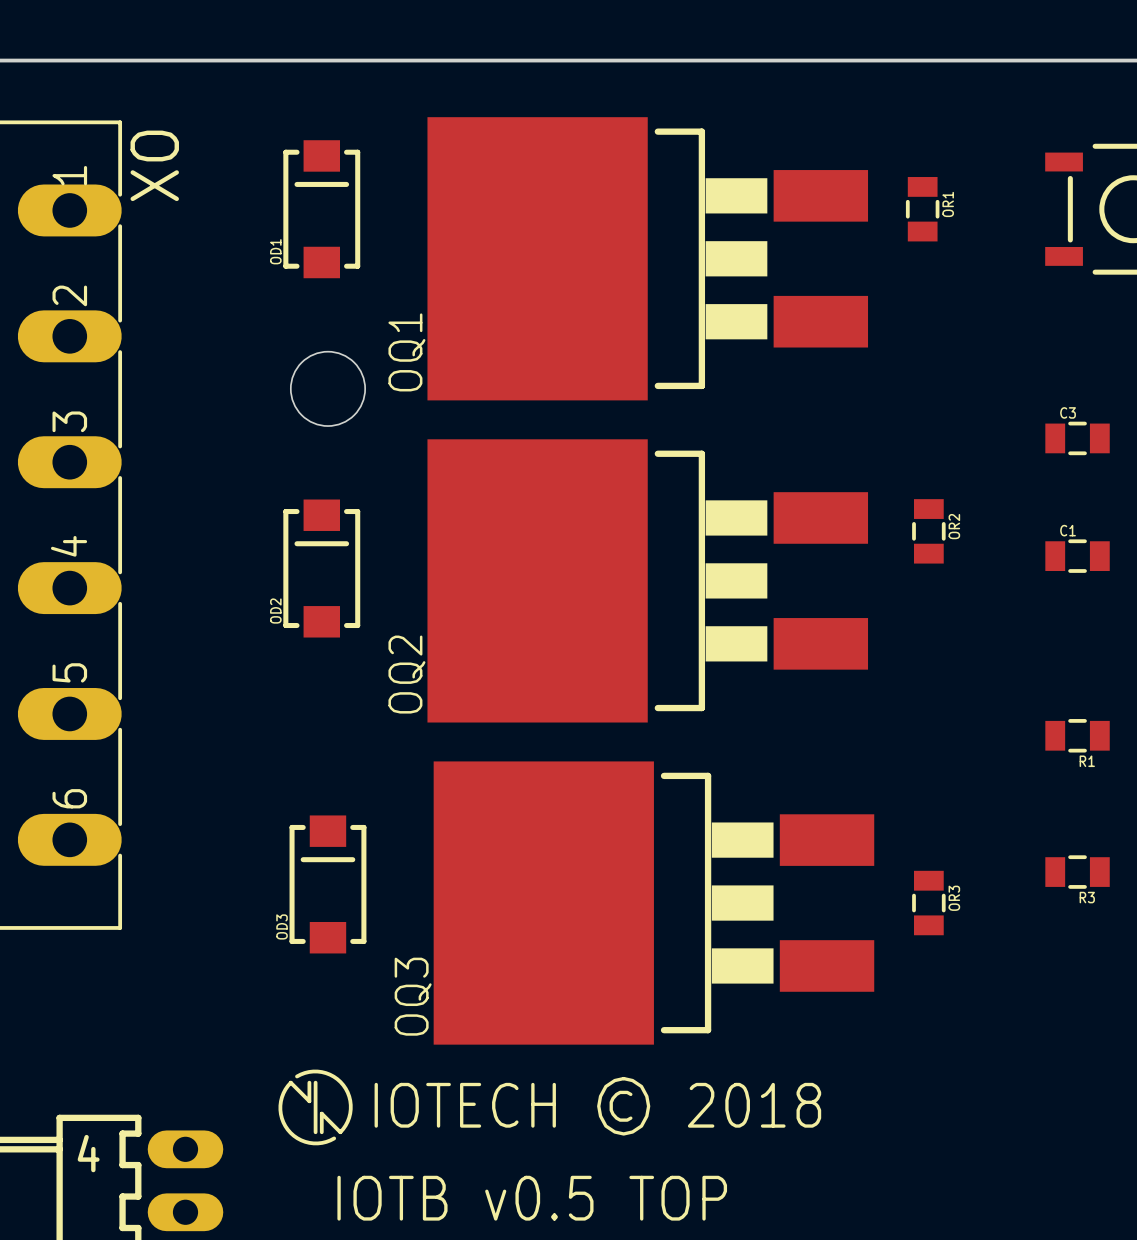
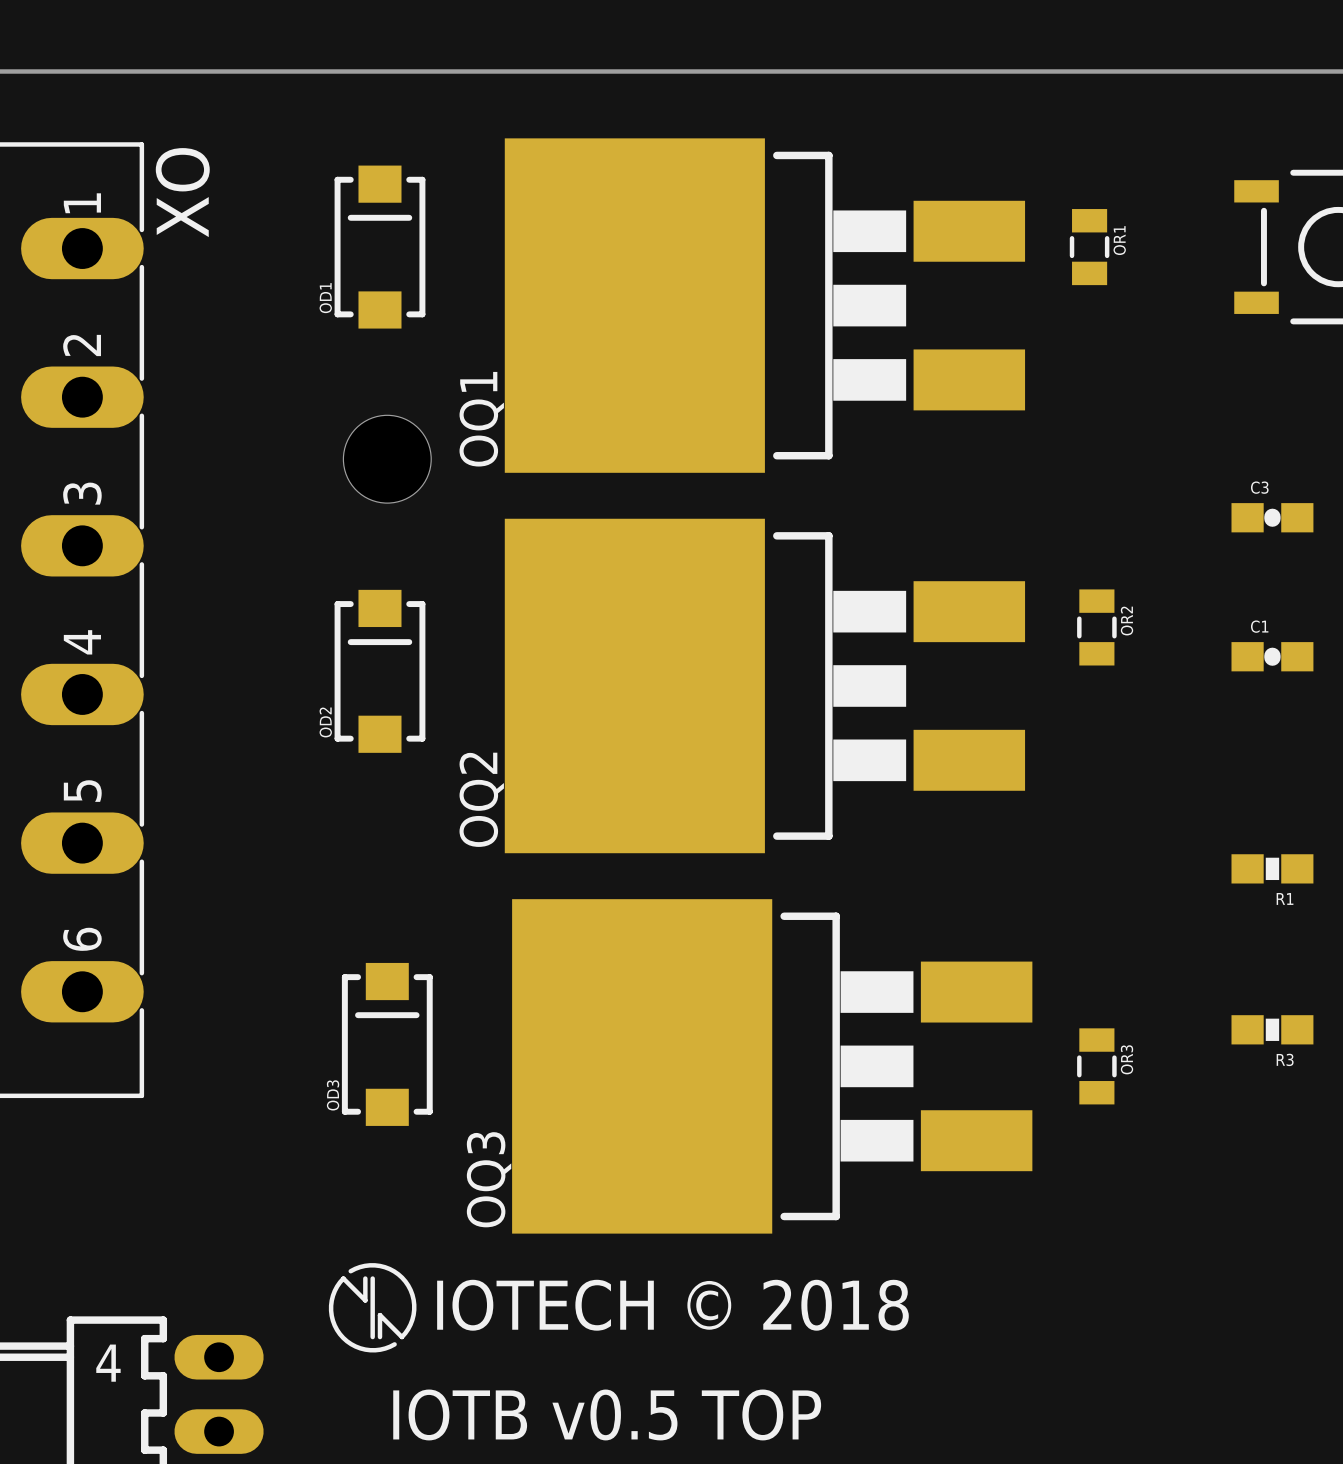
C3 footprint: [1045, 421, 1110, 456] -> [1231, 503, 1314, 533]
C1 footprint: [1045, 539, 1110, 573] -> [1231, 642, 1314, 672]
R1 footprint: [1045, 719, 1110, 753] -> [1231, 854, 1314, 884]
R3 footprint: [1045, 855, 1110, 889] -> [1231, 1015, 1314, 1045]

